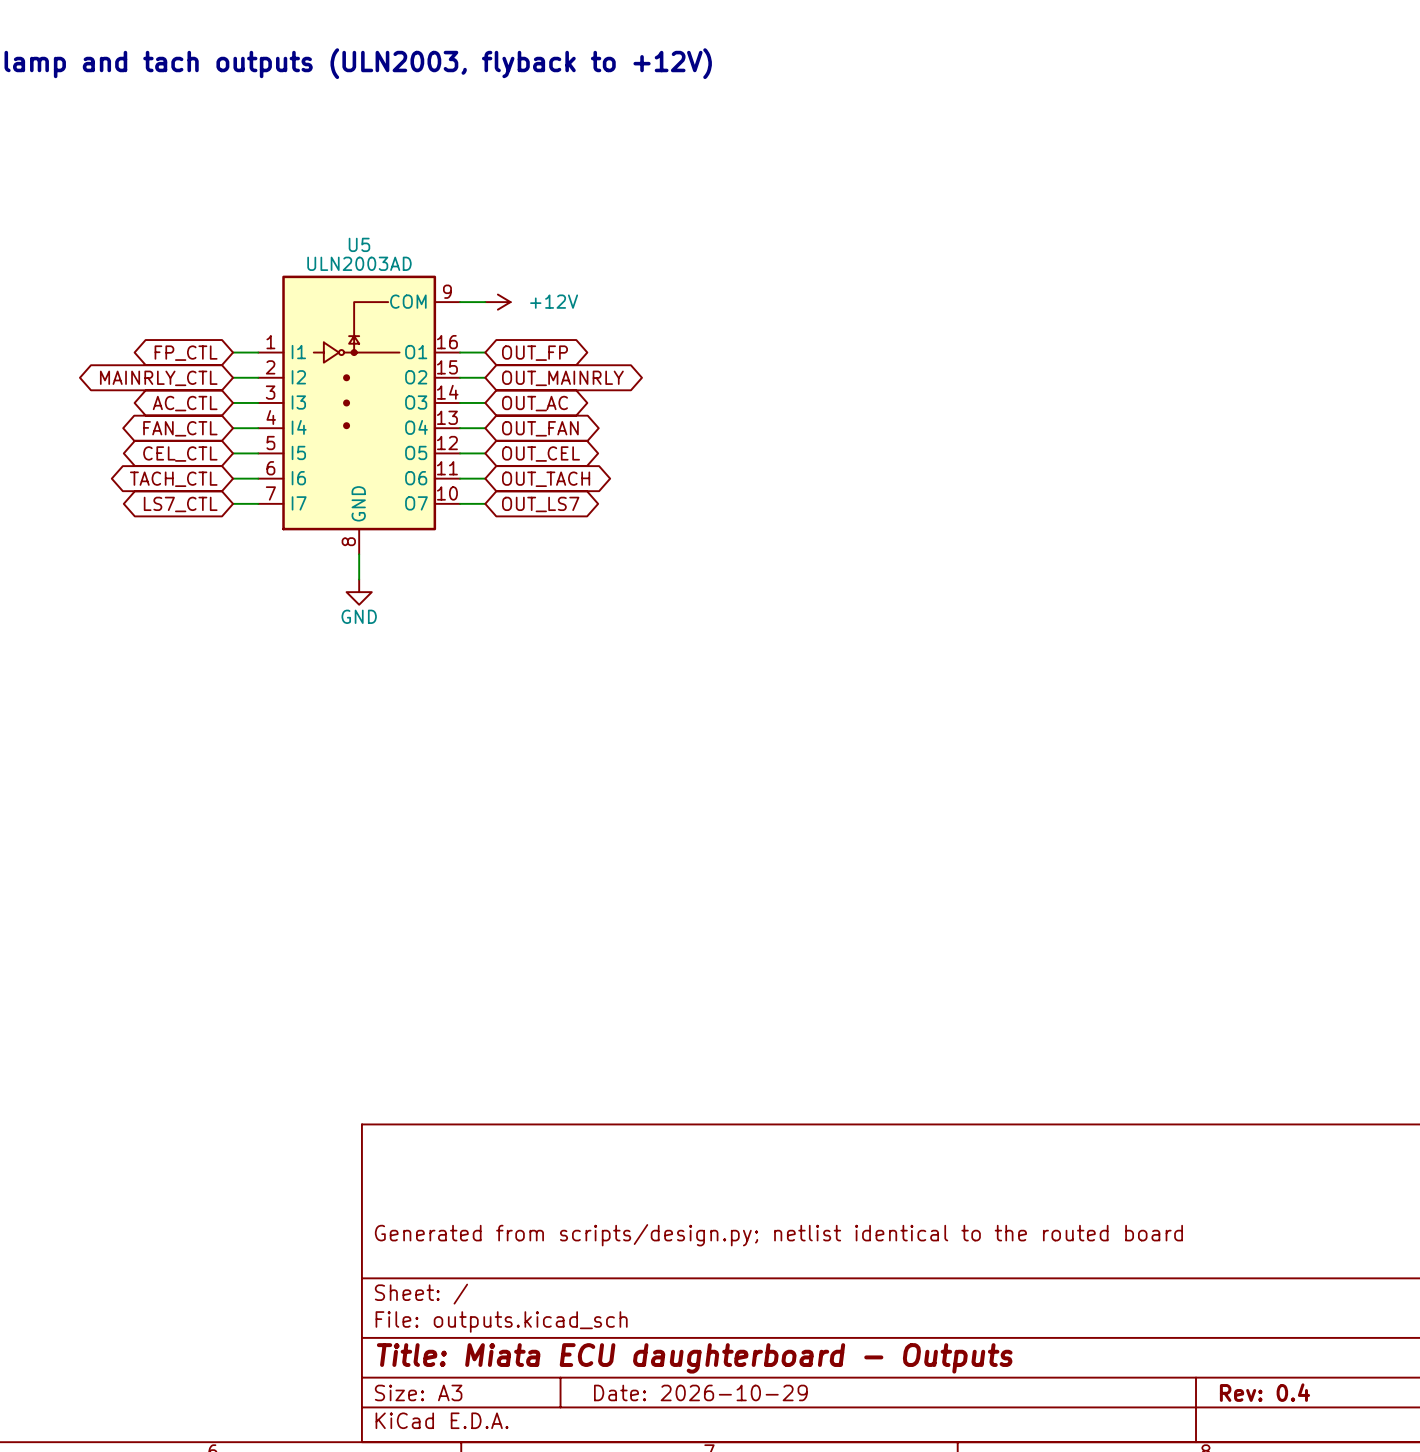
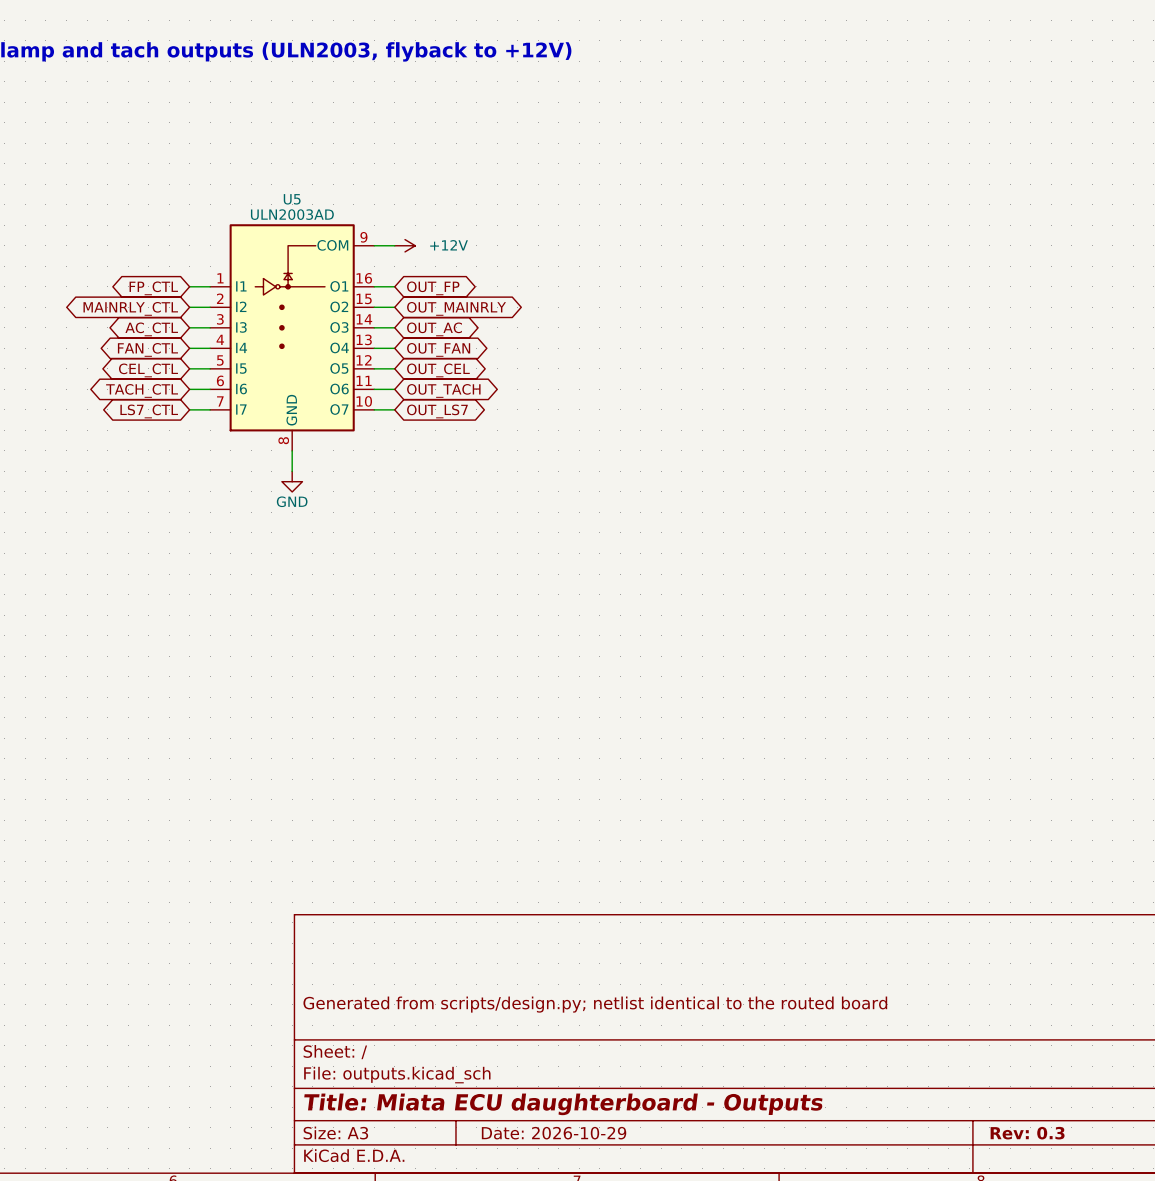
title block: Rev: 0.4 (1264, 1392) -> Rev: 0.3 (1027, 1133)

